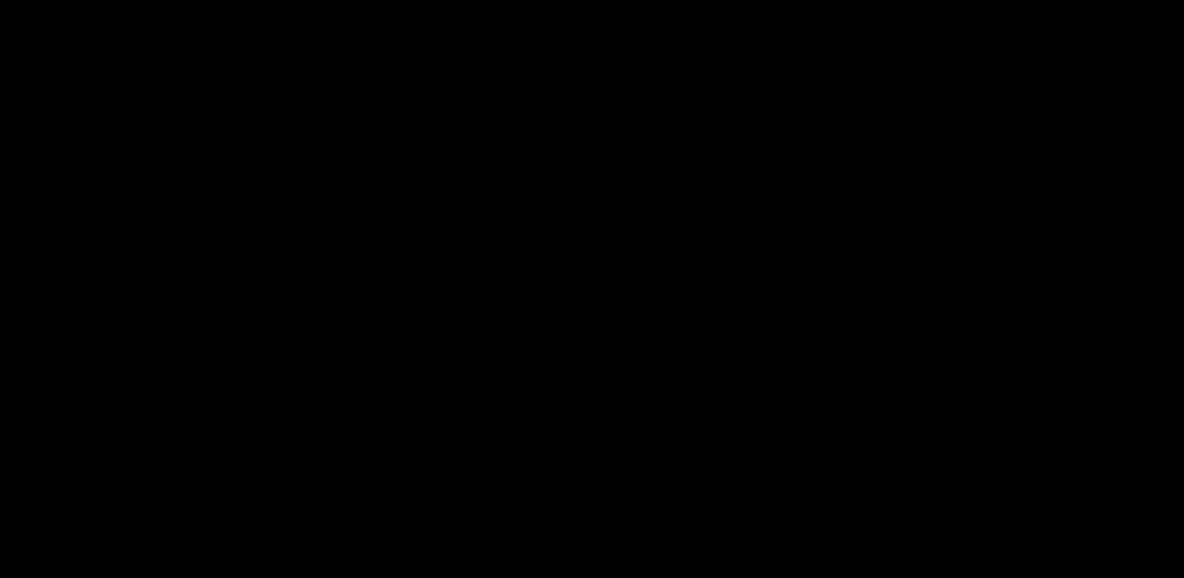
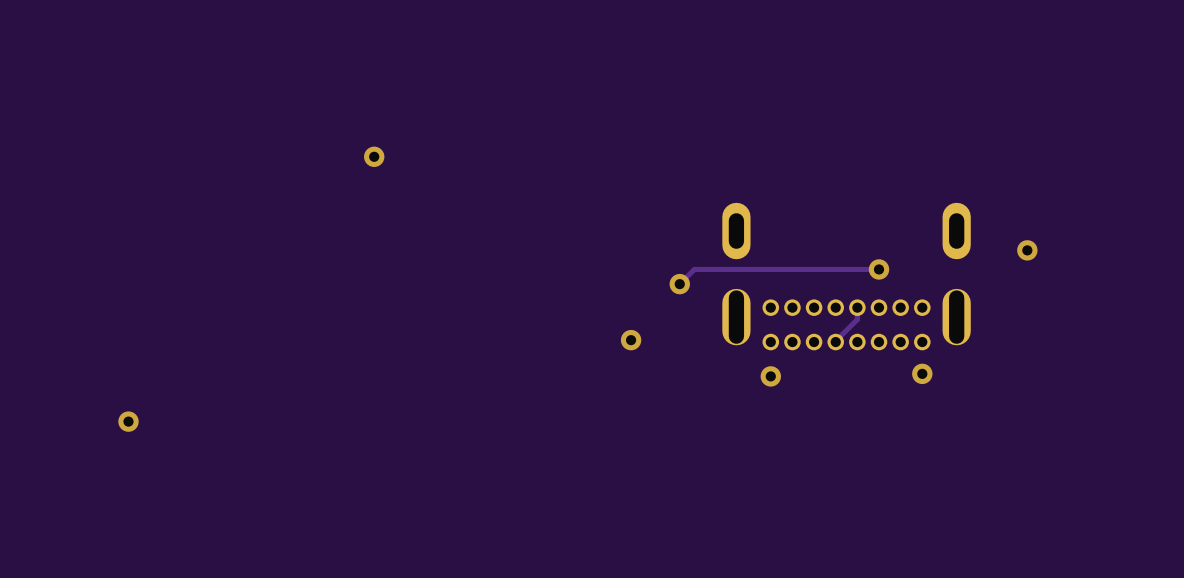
via: none -> (374, 156)
via: none -> (1027, 250)
track: none -> (879, 269) (694, 269) (679, 284)
via: none -> (879, 269)
part: none -> (846, 276)
via: none -> (679, 284)
track: none -> (857, 307) (857, 319) (835, 342)
via: none -> (631, 340)
via: none -> (922, 373)
via: none -> (770, 376)
via: none -> (128, 421)

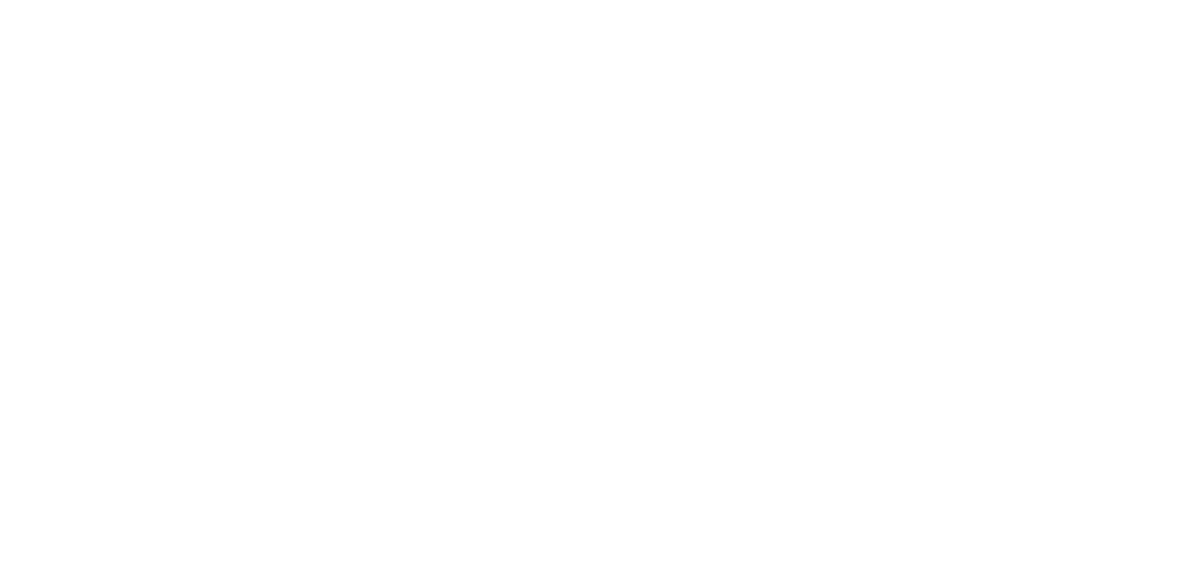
via: (374, 156) -> none
via: (1027, 250) -> none
track: (879, 269) (694, 269) (679, 284) -> none
via: (879, 269) -> none
part: (846, 276) -> none
via: (679, 284) -> none
track: (857, 307) (857, 319) (835, 342) -> none
via: (631, 340) -> none
via: (922, 373) -> none
via: (770, 376) -> none
via: (128, 421) -> none

